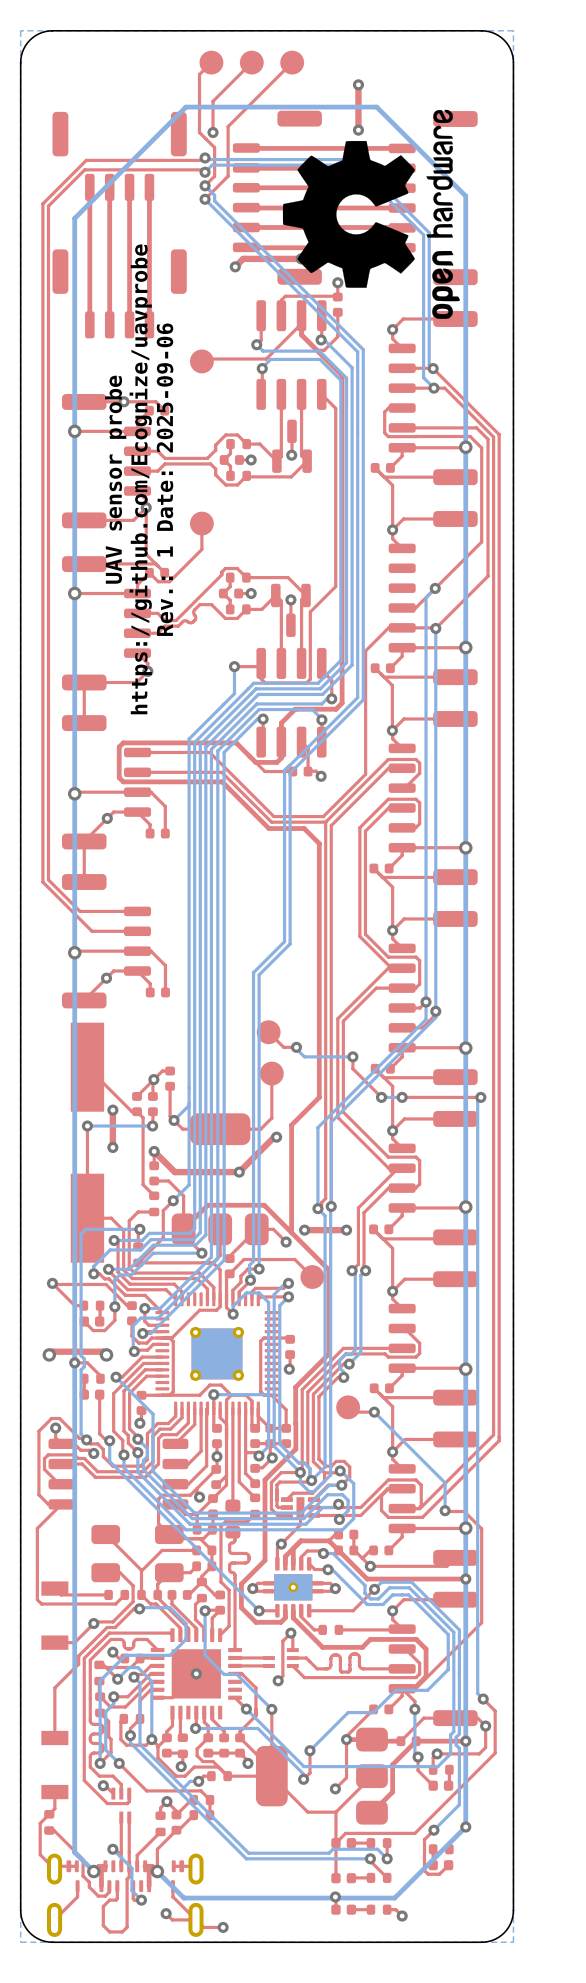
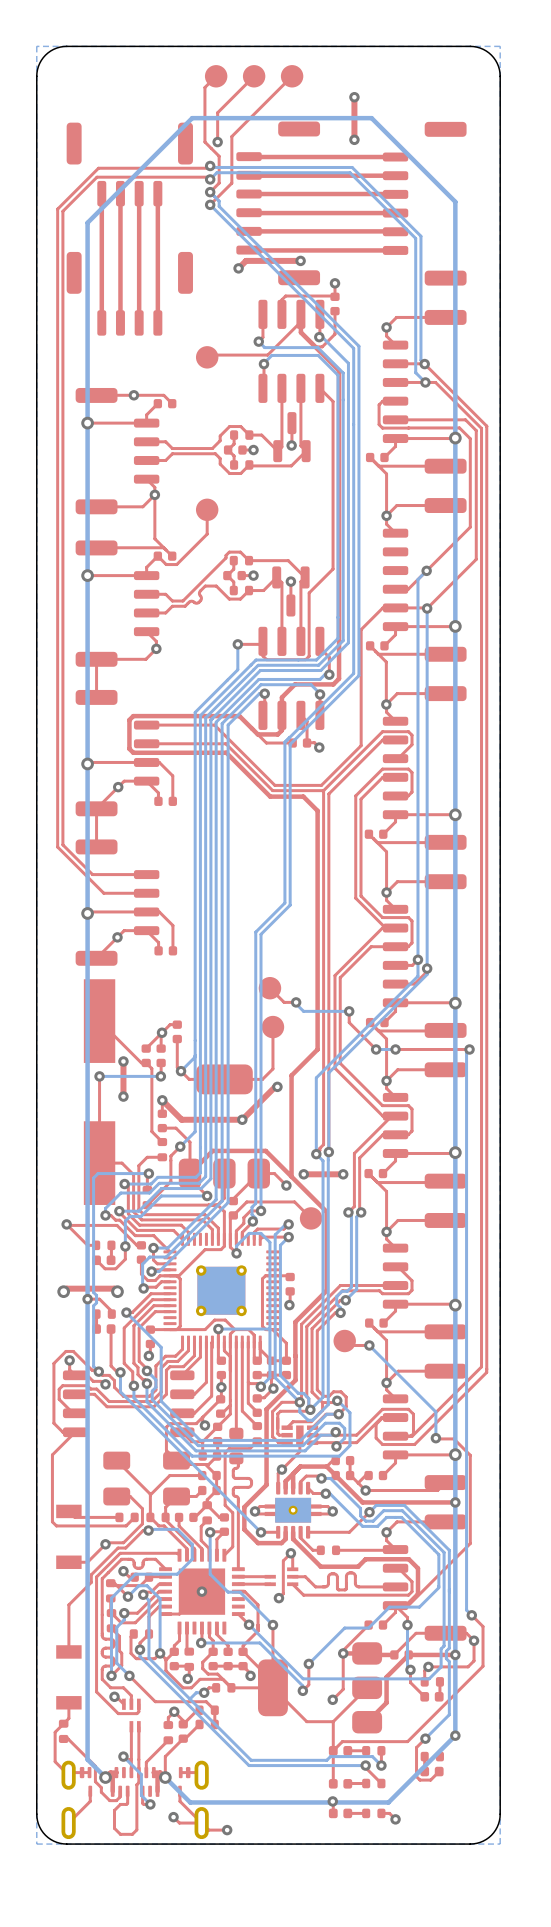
drawing: [282, 109, 460, 319] -> none
text: UAV sensor probe (115, 479) -> none
text: https://github.com/Ecognize/uavprobe (140, 479) -> none
text: Rev.: 1 Date: 2025-09-06 (165, 479) -> none

